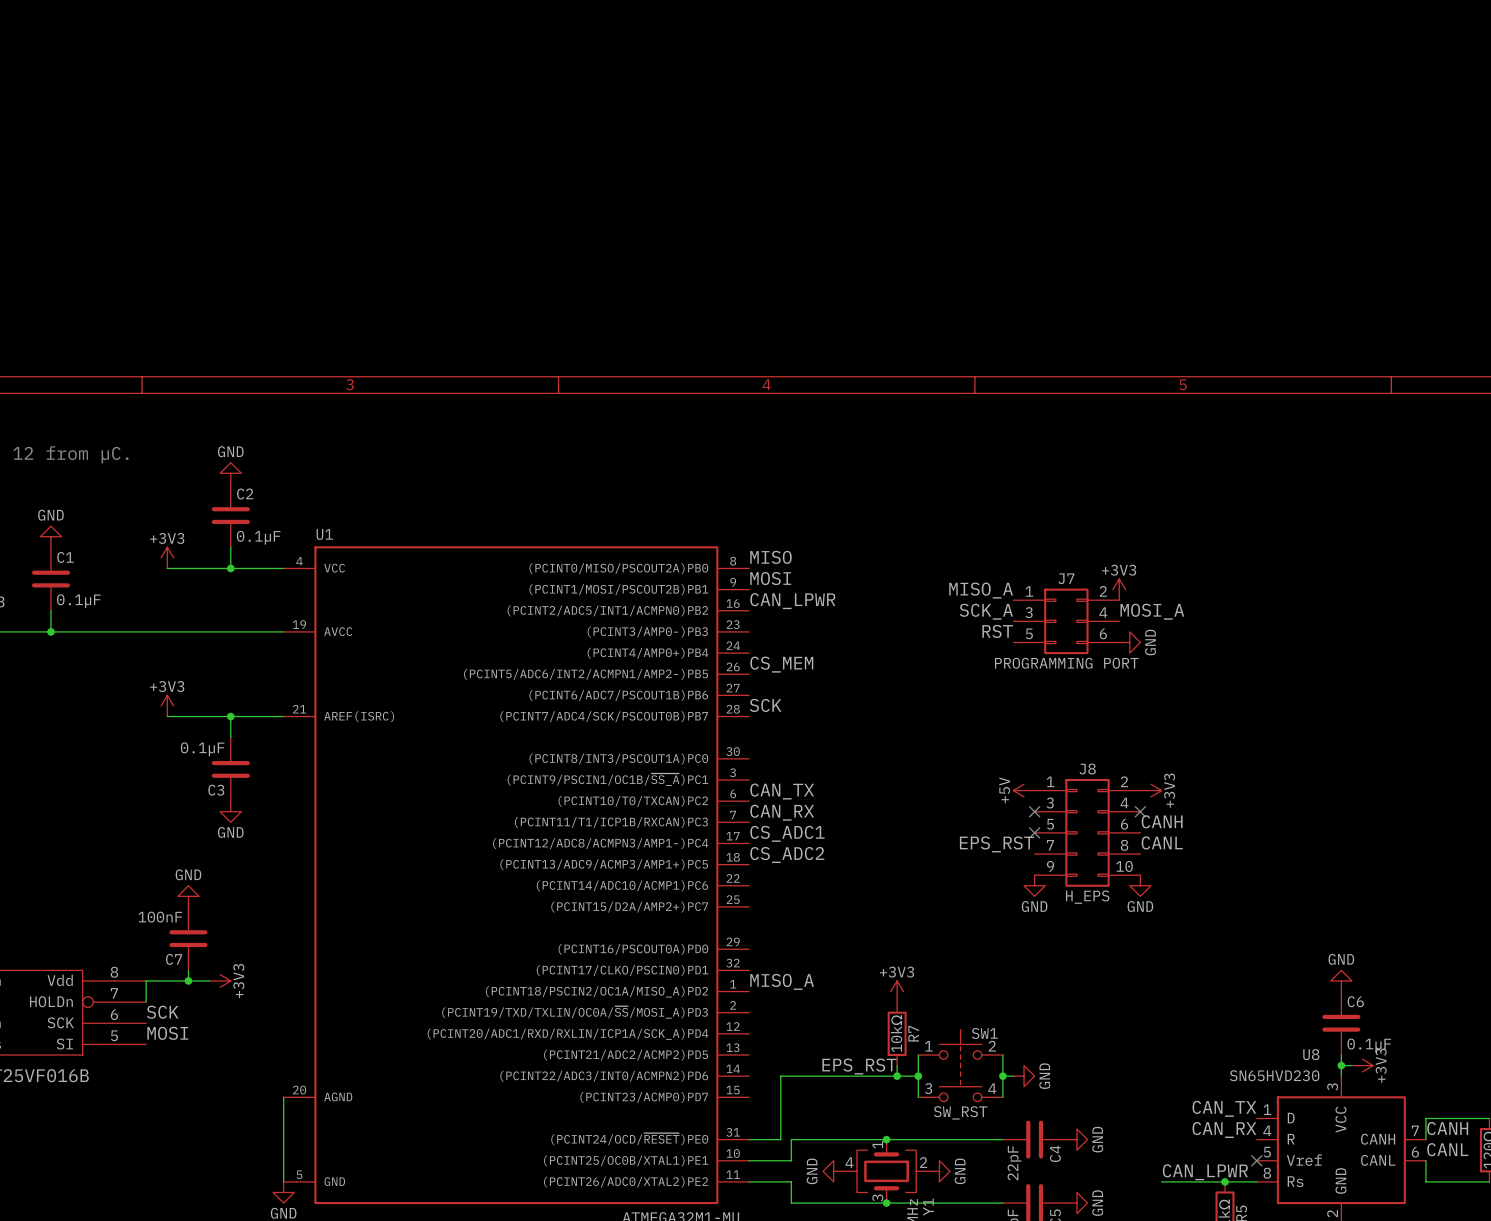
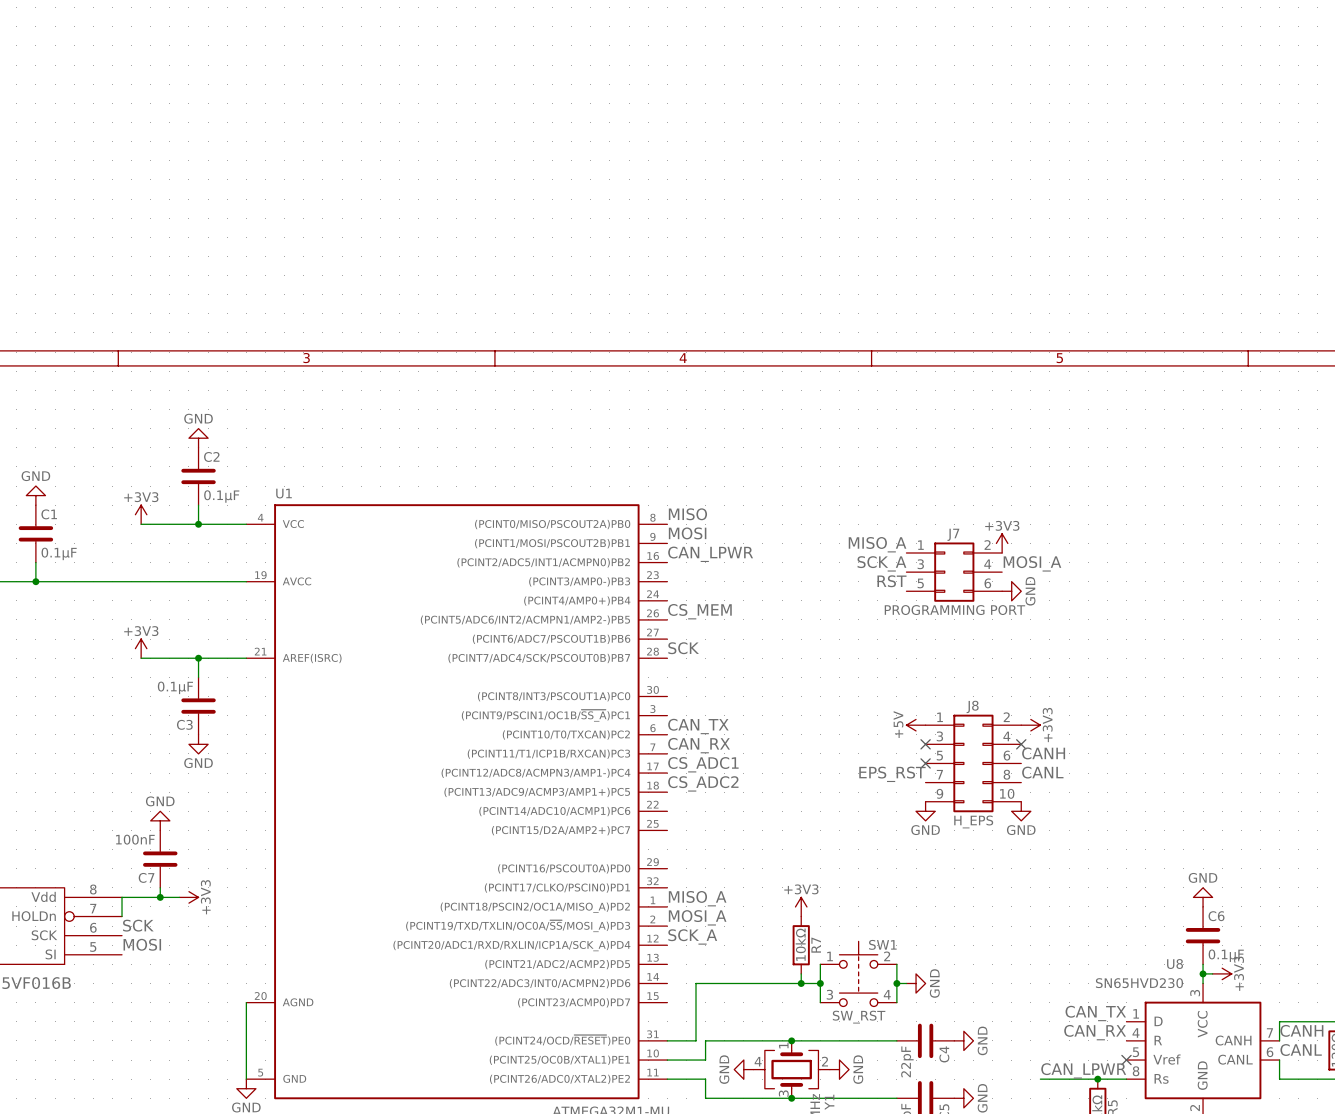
label: none -> MOSI_A (697, 917)
label: none -> SCK_A (692, 936)
label: EPS_RST (859, 1066) -> none

